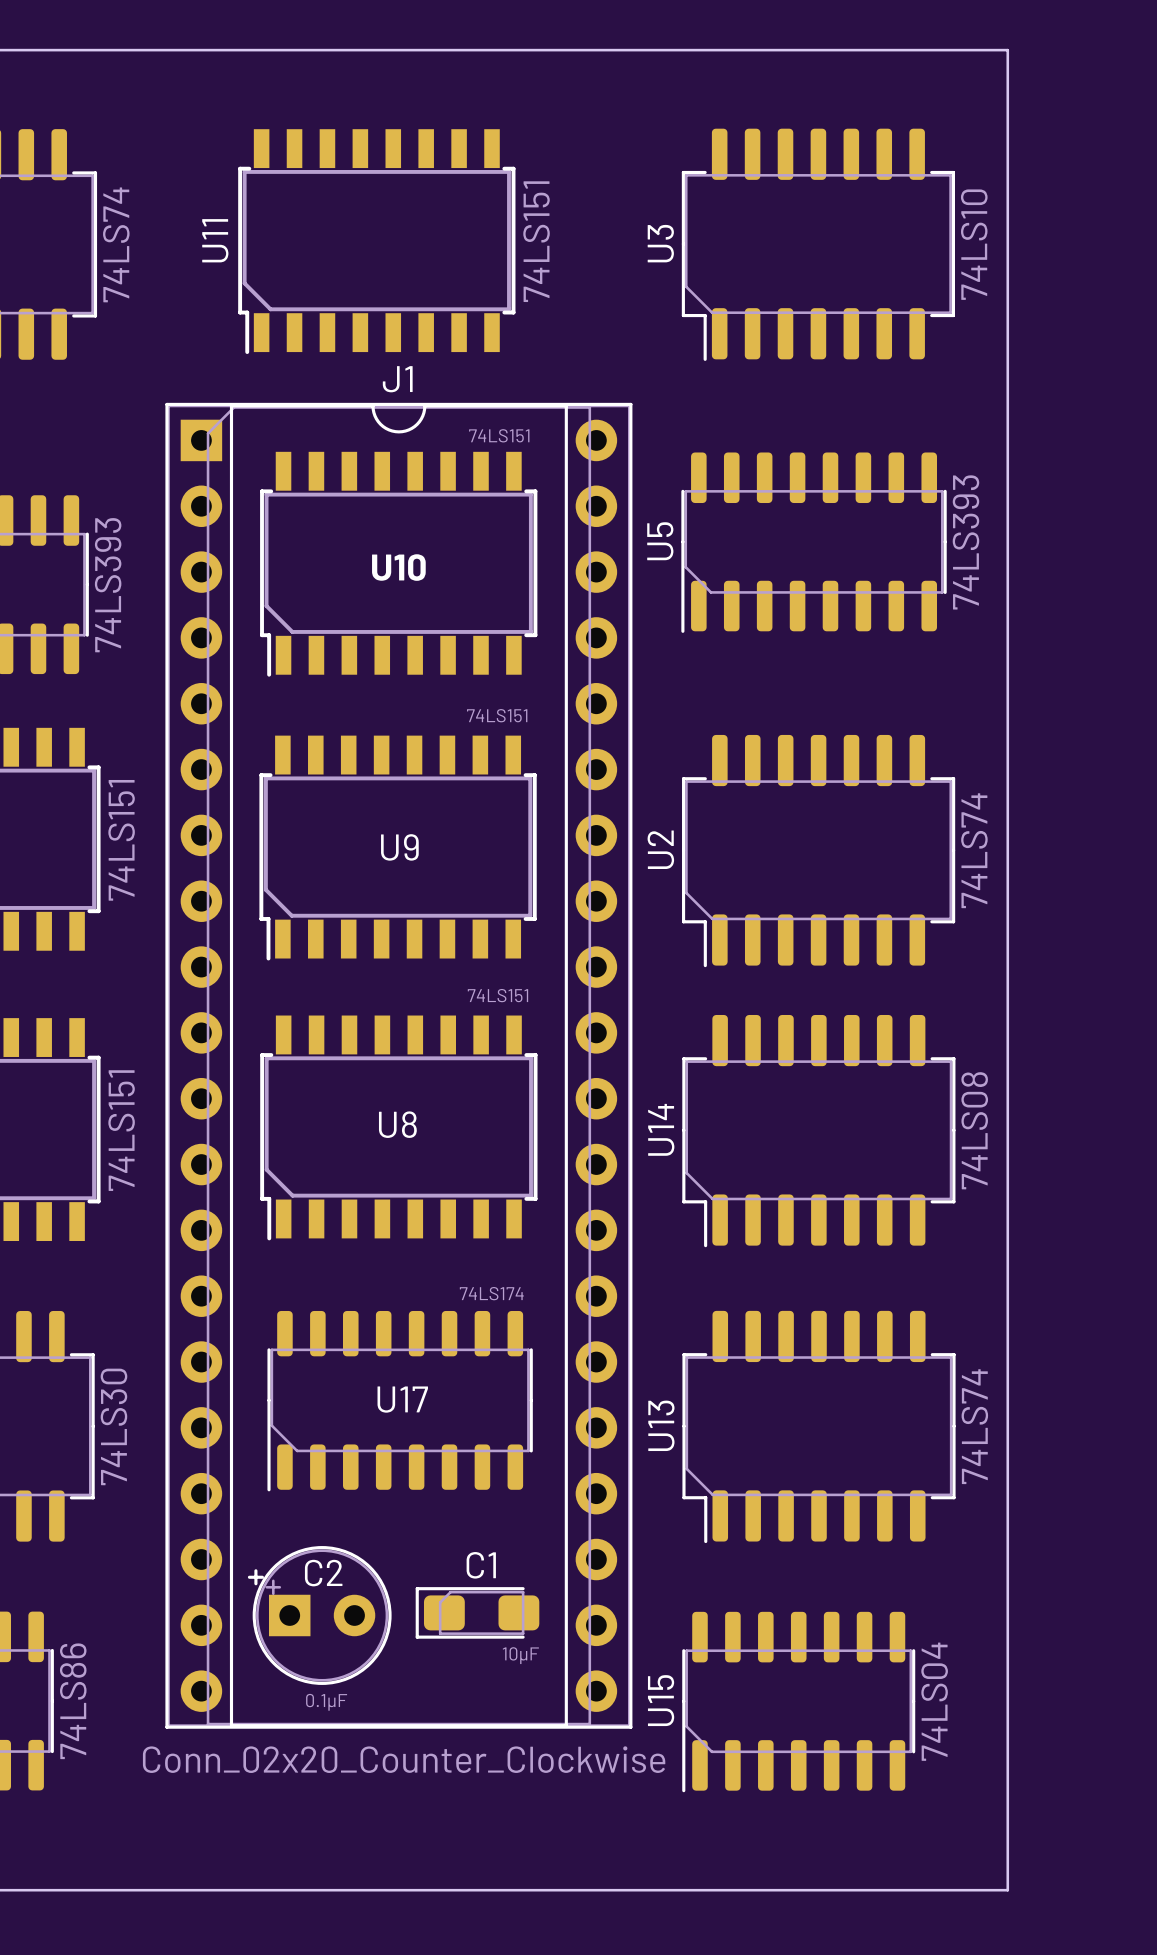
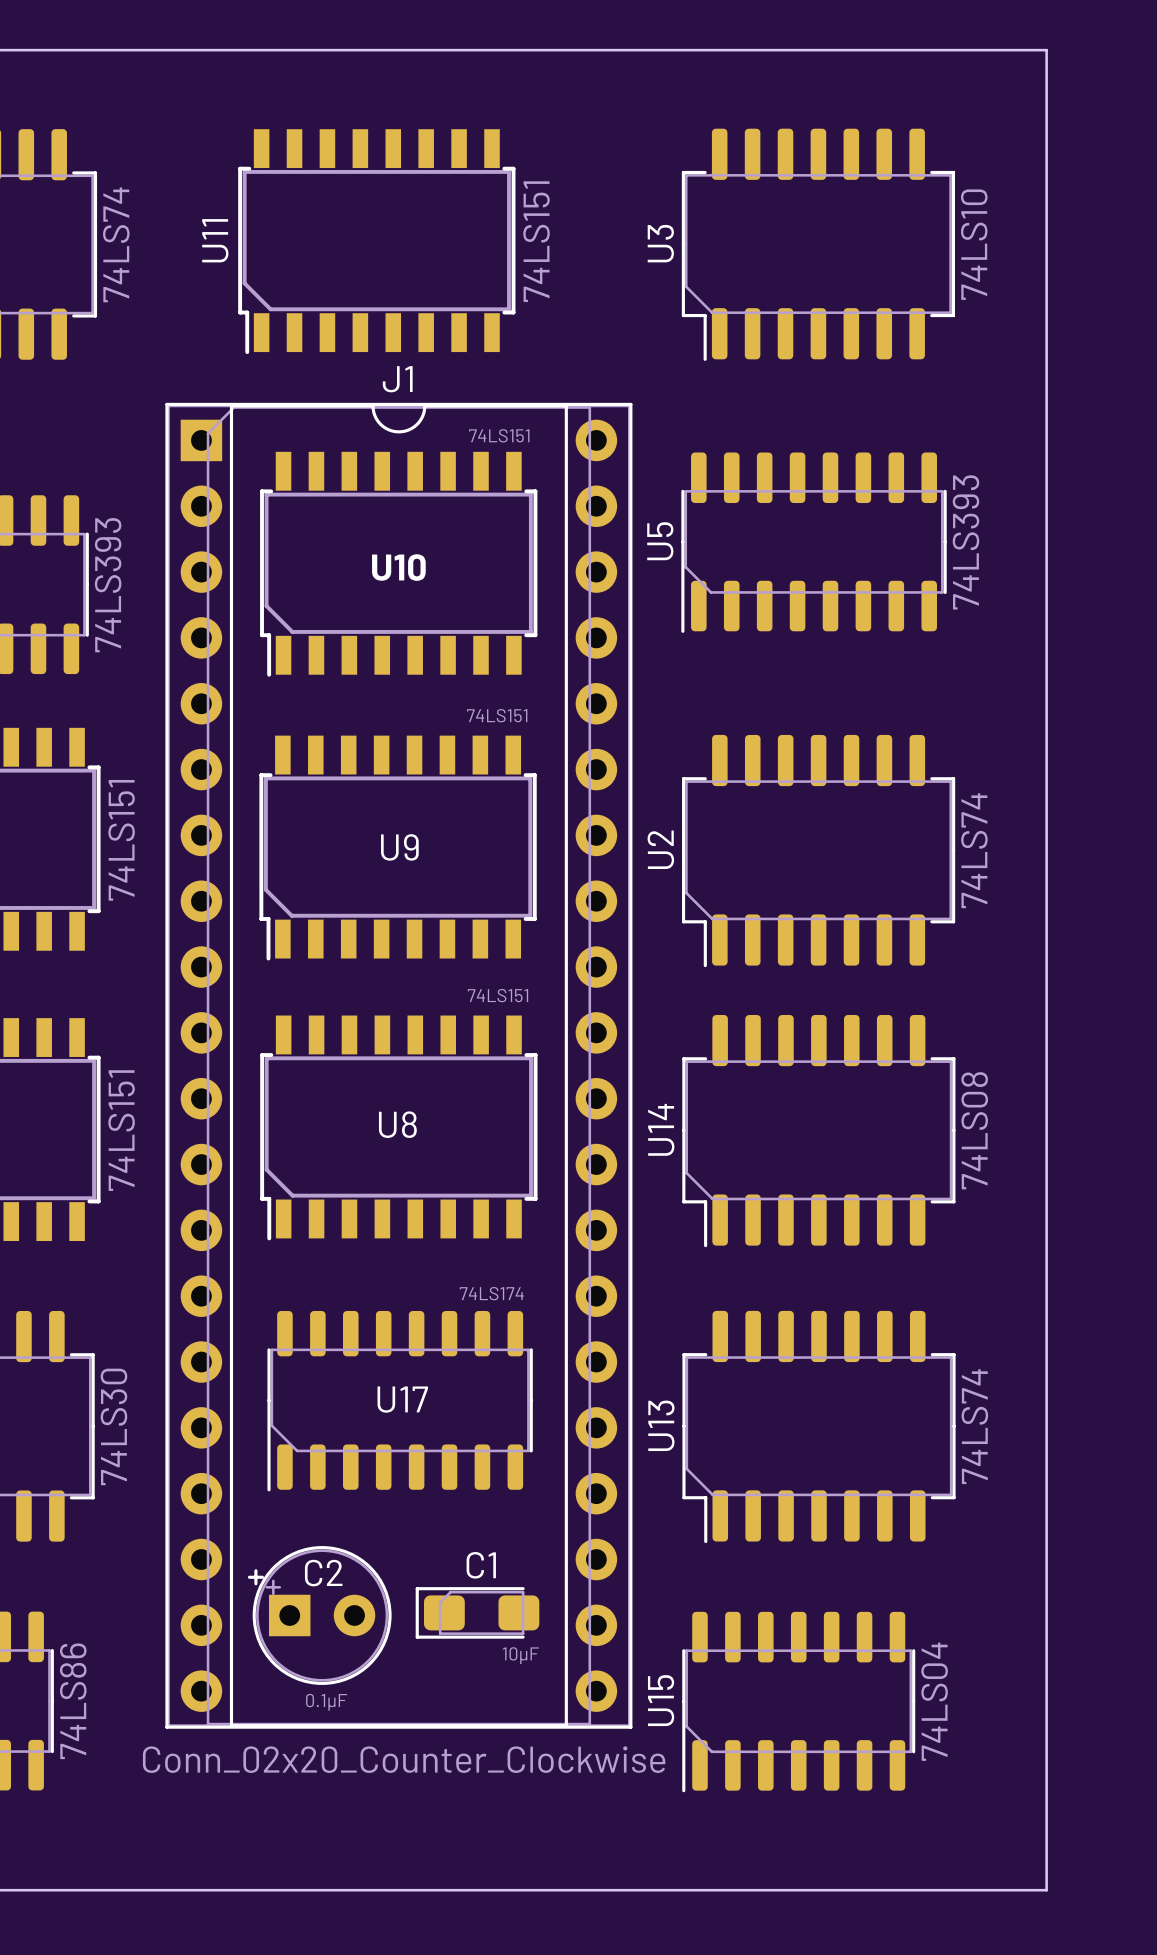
board edge: (1007, 50) (1007, 1890) -> (1007, 50) (1046, 50) (1046, 1890) (1007, 1890)

